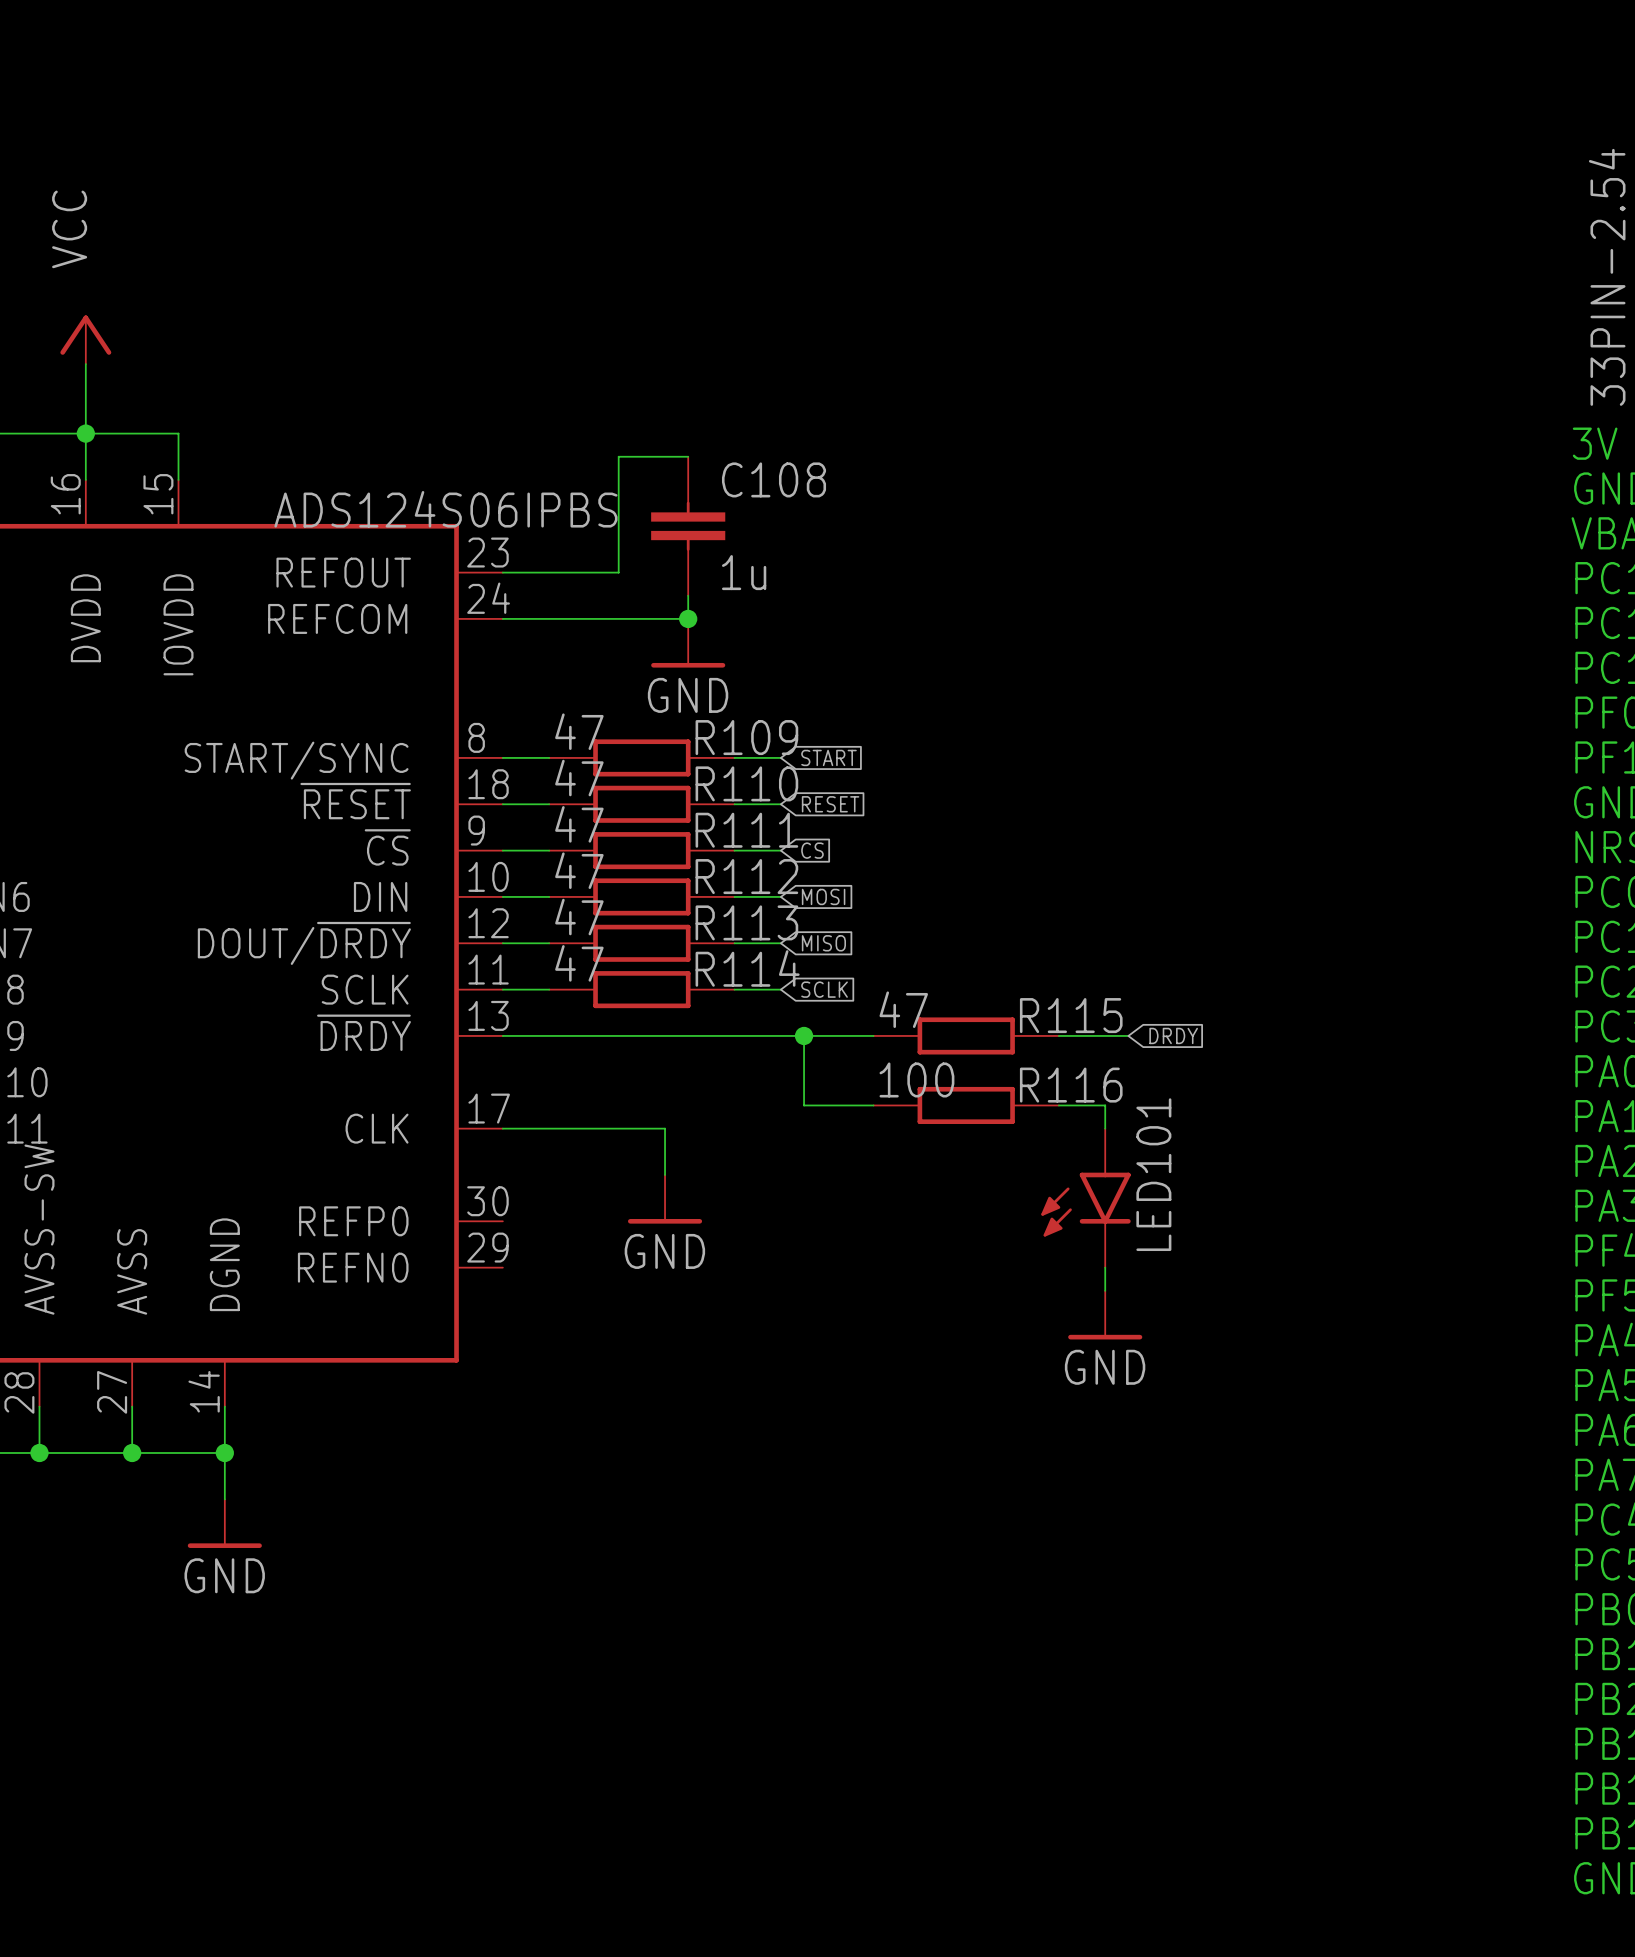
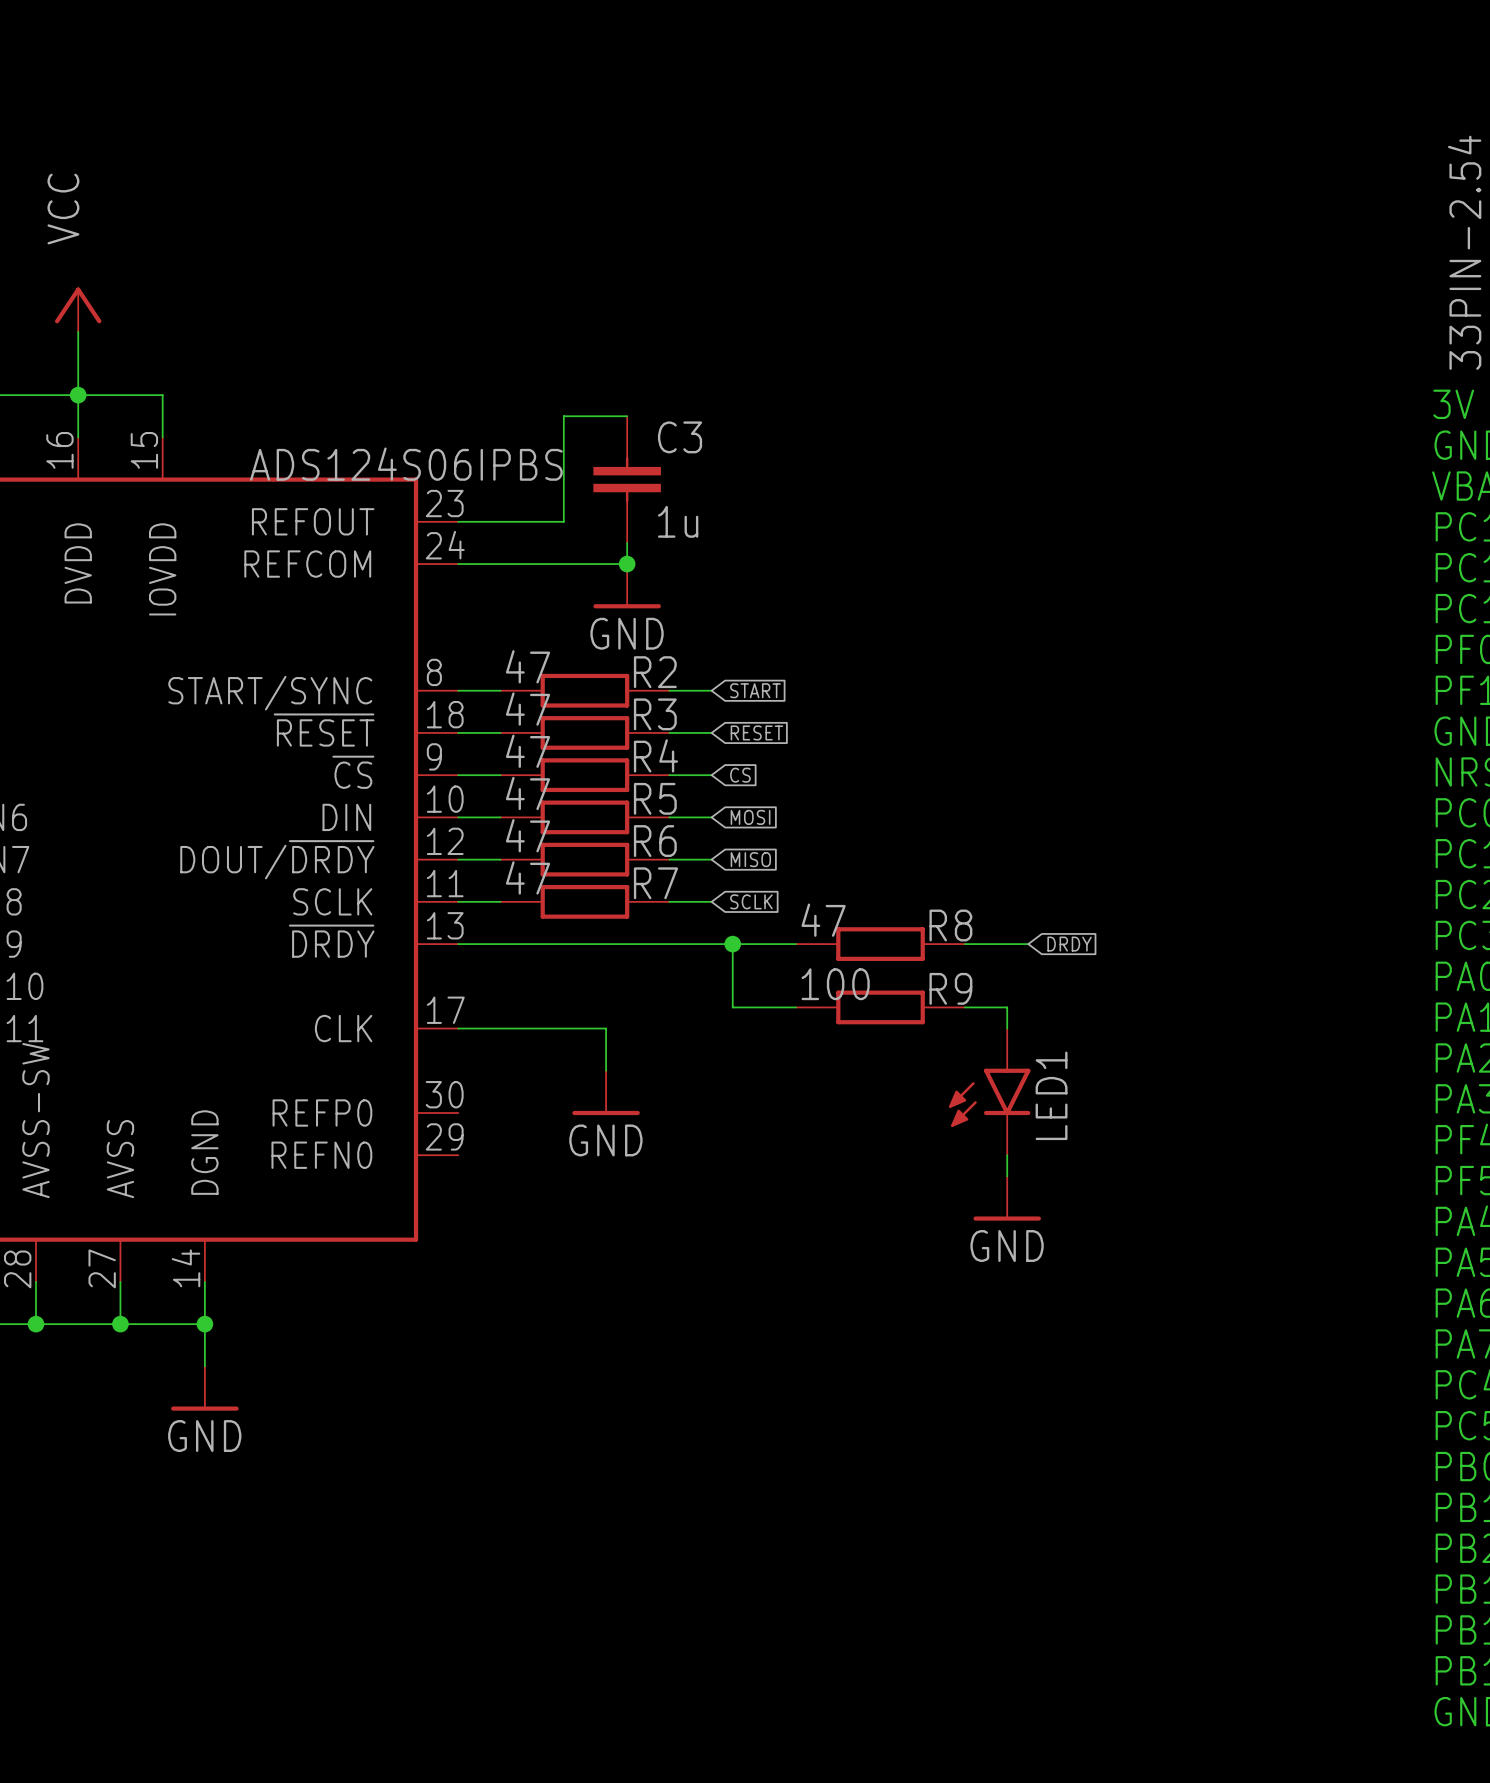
C108 name: C108 (774, 479) -> C3 (680, 437)
R109 name: R109 (746, 737) -> R2 (655, 672)
R110 name: R110 (746, 783) -> R3 (655, 714)
R111 name: R111 (746, 830) -> R4 (655, 755)
R112 name: R112 (746, 876) -> R5 (655, 798)
R113 name: R113 (746, 922) -> R6 (655, 841)
R114 name: R114 (747, 968) -> R7 (655, 883)
R115 name: R115 (1071, 1015) -> R8 (950, 925)
R116 name: R116 (1071, 1085) -> R9 (950, 988)
LED101 name: LED101 (1153, 1174) -> LED1 (1051, 1095)

